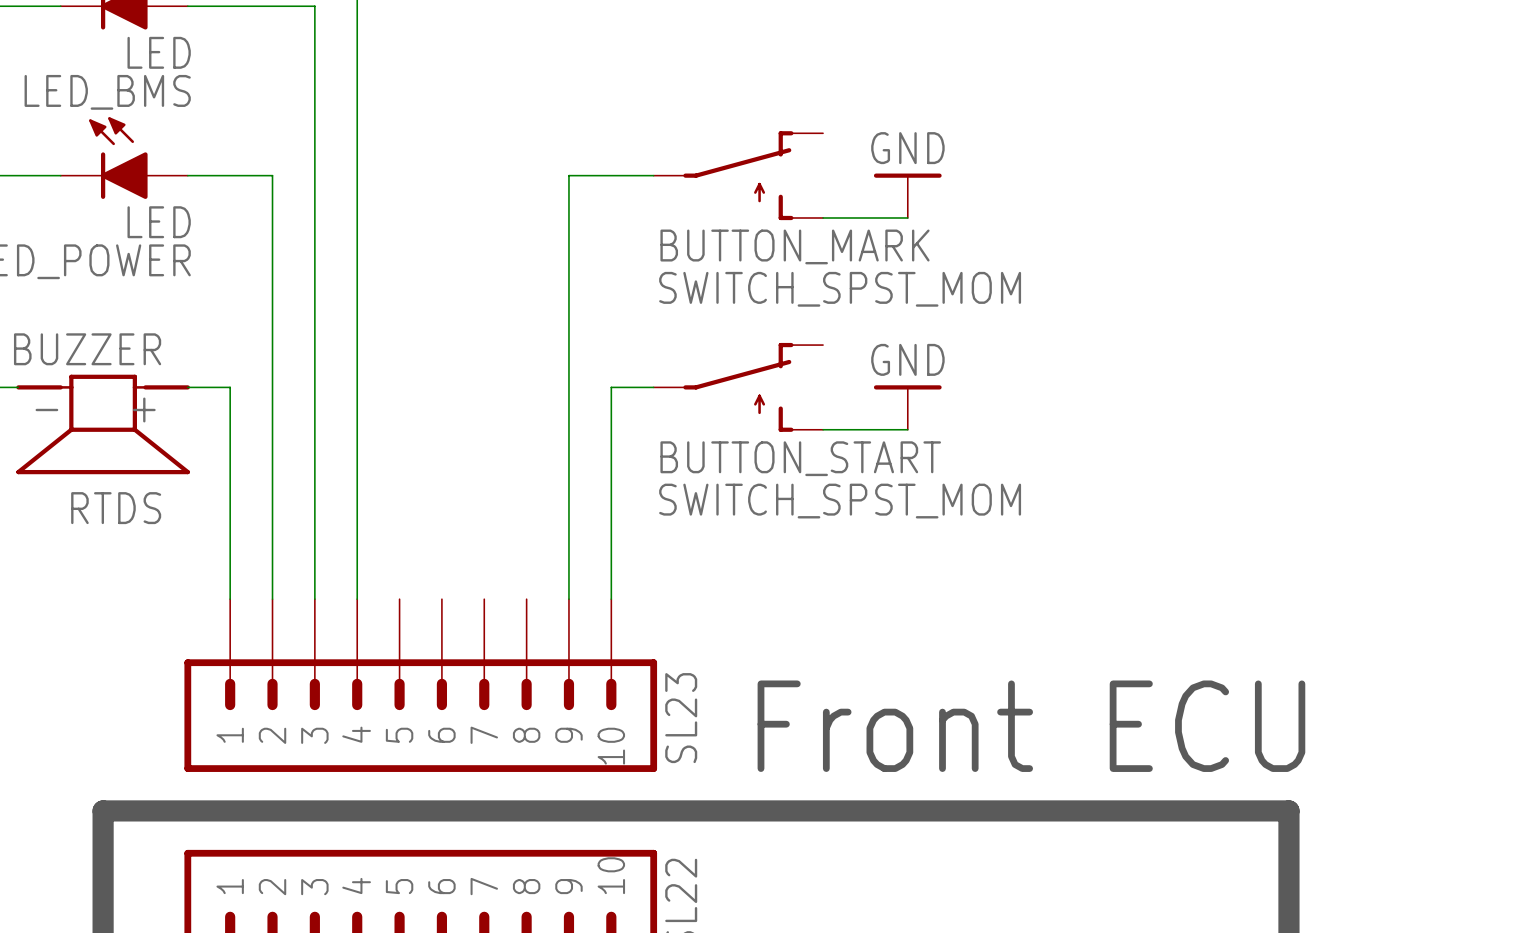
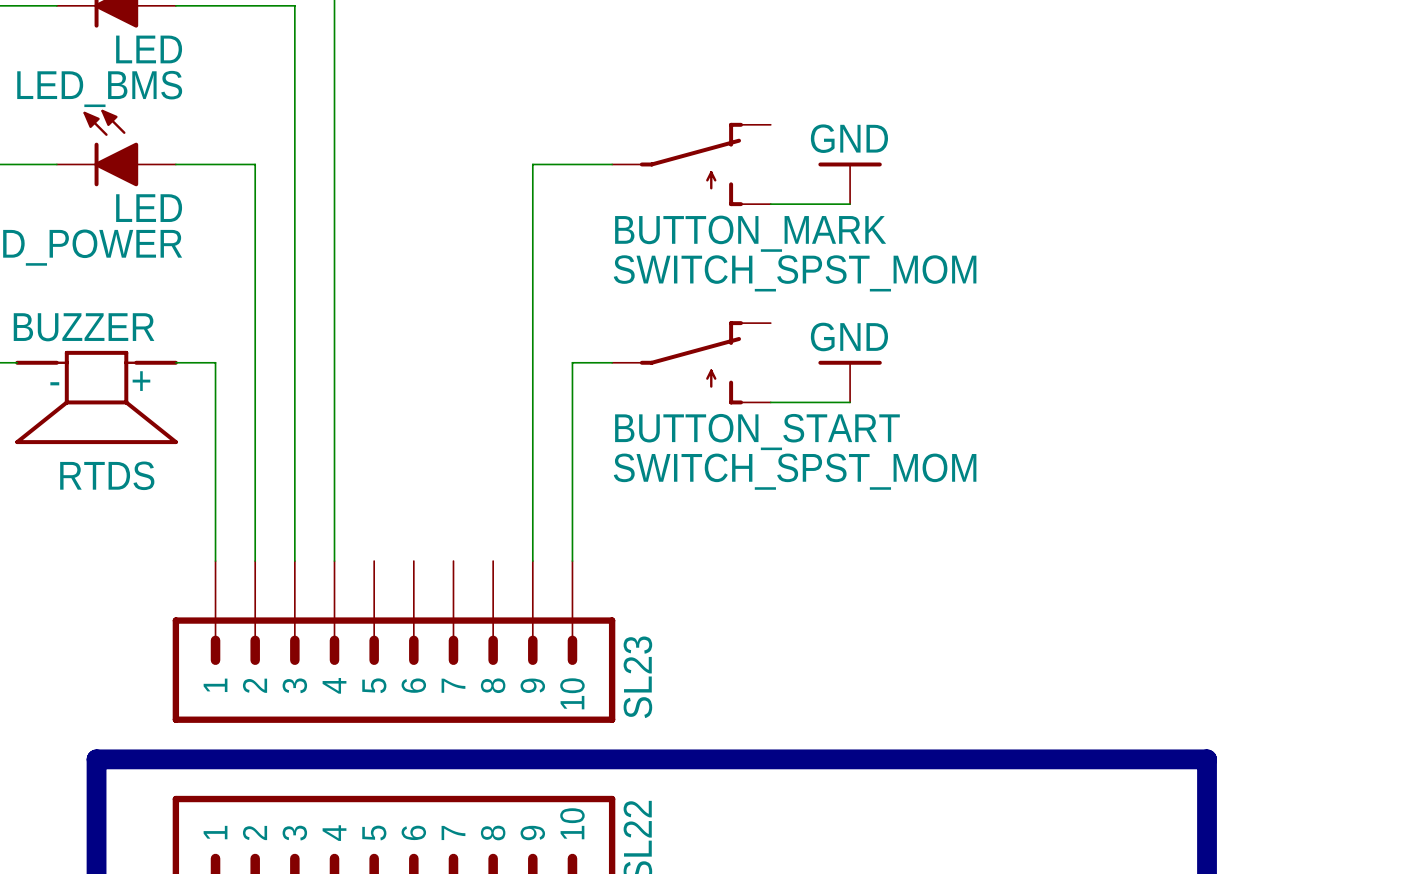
text: Front ECU (1031, 726) -> none

